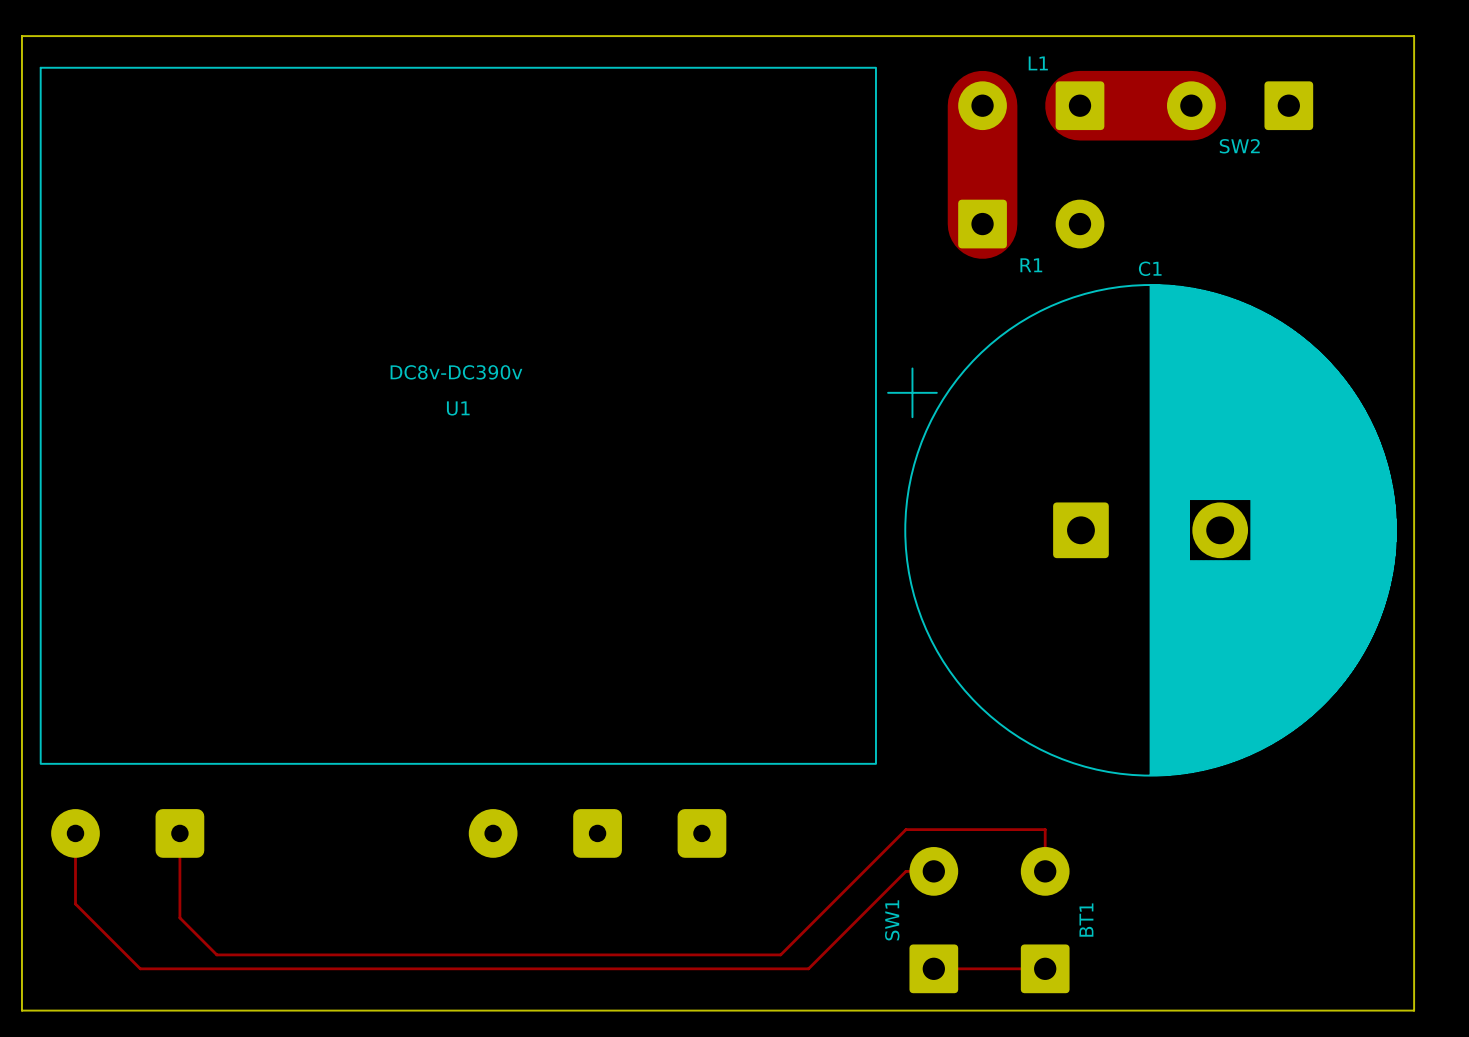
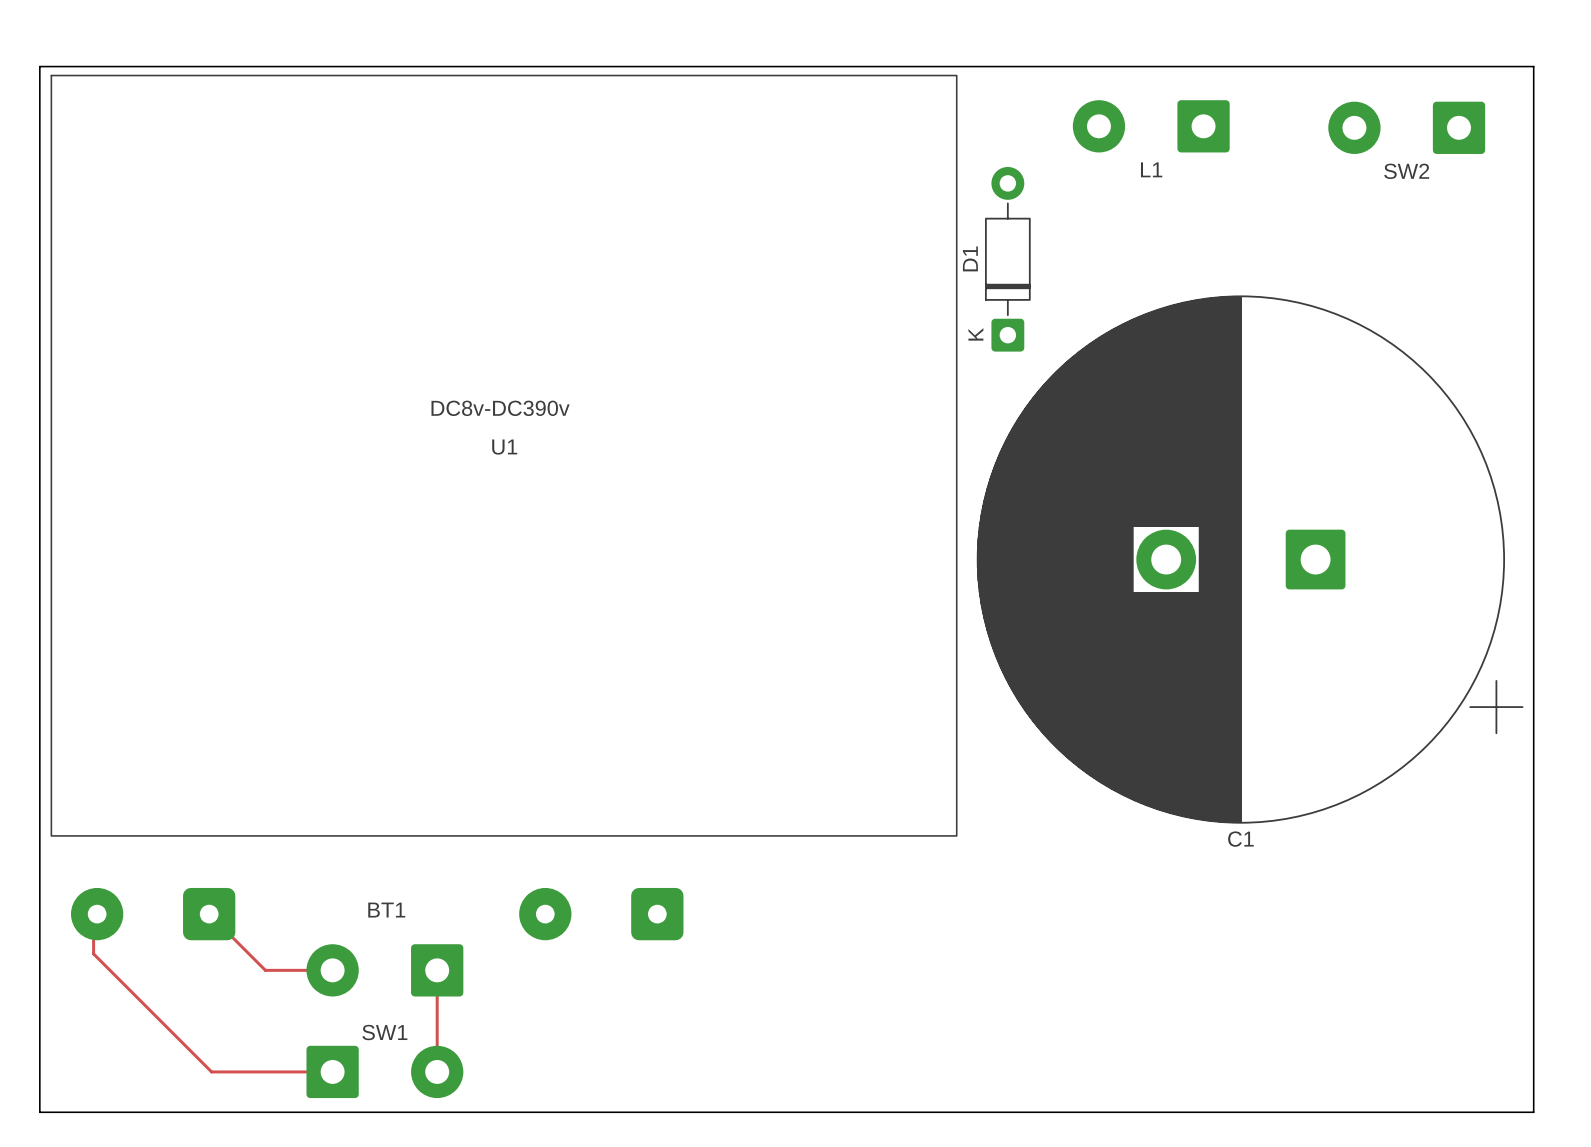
L1 name position: L1 (1038, 63) -> L1 (1151, 169)
U1 footprint: [40, 67, 877, 858] -> [50, 74, 958, 941]
track: (982, 105) (982, 224) -> none
L1 position: (1031, 105) -> (1151, 126)
track: (1080, 105) (1191, 105) -> none
SW2 position: (1240, 105) -> (1406, 127)
D1: none -> (1007, 259)
R1: (1031, 224) -> none
C1 rotation: 0° (1141, 530) -> 180° (1250, 559)
track: none -> (93, 903) (93, 953) (211, 1071) (332, 1071)
track: none -> (209, 914) (265, 970) (332, 970)
track: (75, 833) (75, 904) (140, 968) (808, 968) (905, 871) (933, 871) -> none
track: (175, 838) (179, 833) (179, 917) (216, 954) (780, 954) (905, 829) (1045, 829) (1045, 871) -> none
track: none -> (437, 970) (437, 1071)
SW1 rotation: 0° (933, 920) -> 90° clockwise (384, 1071)
SW1 position: (933, 920) -> (384, 1071)
BT1 rotation: 0° (1045, 920) -> 90° counterclockwise (384, 970)
BT1 position: (1045, 920) -> (384, 970)
track: (933, 968) (1045, 968) -> none

